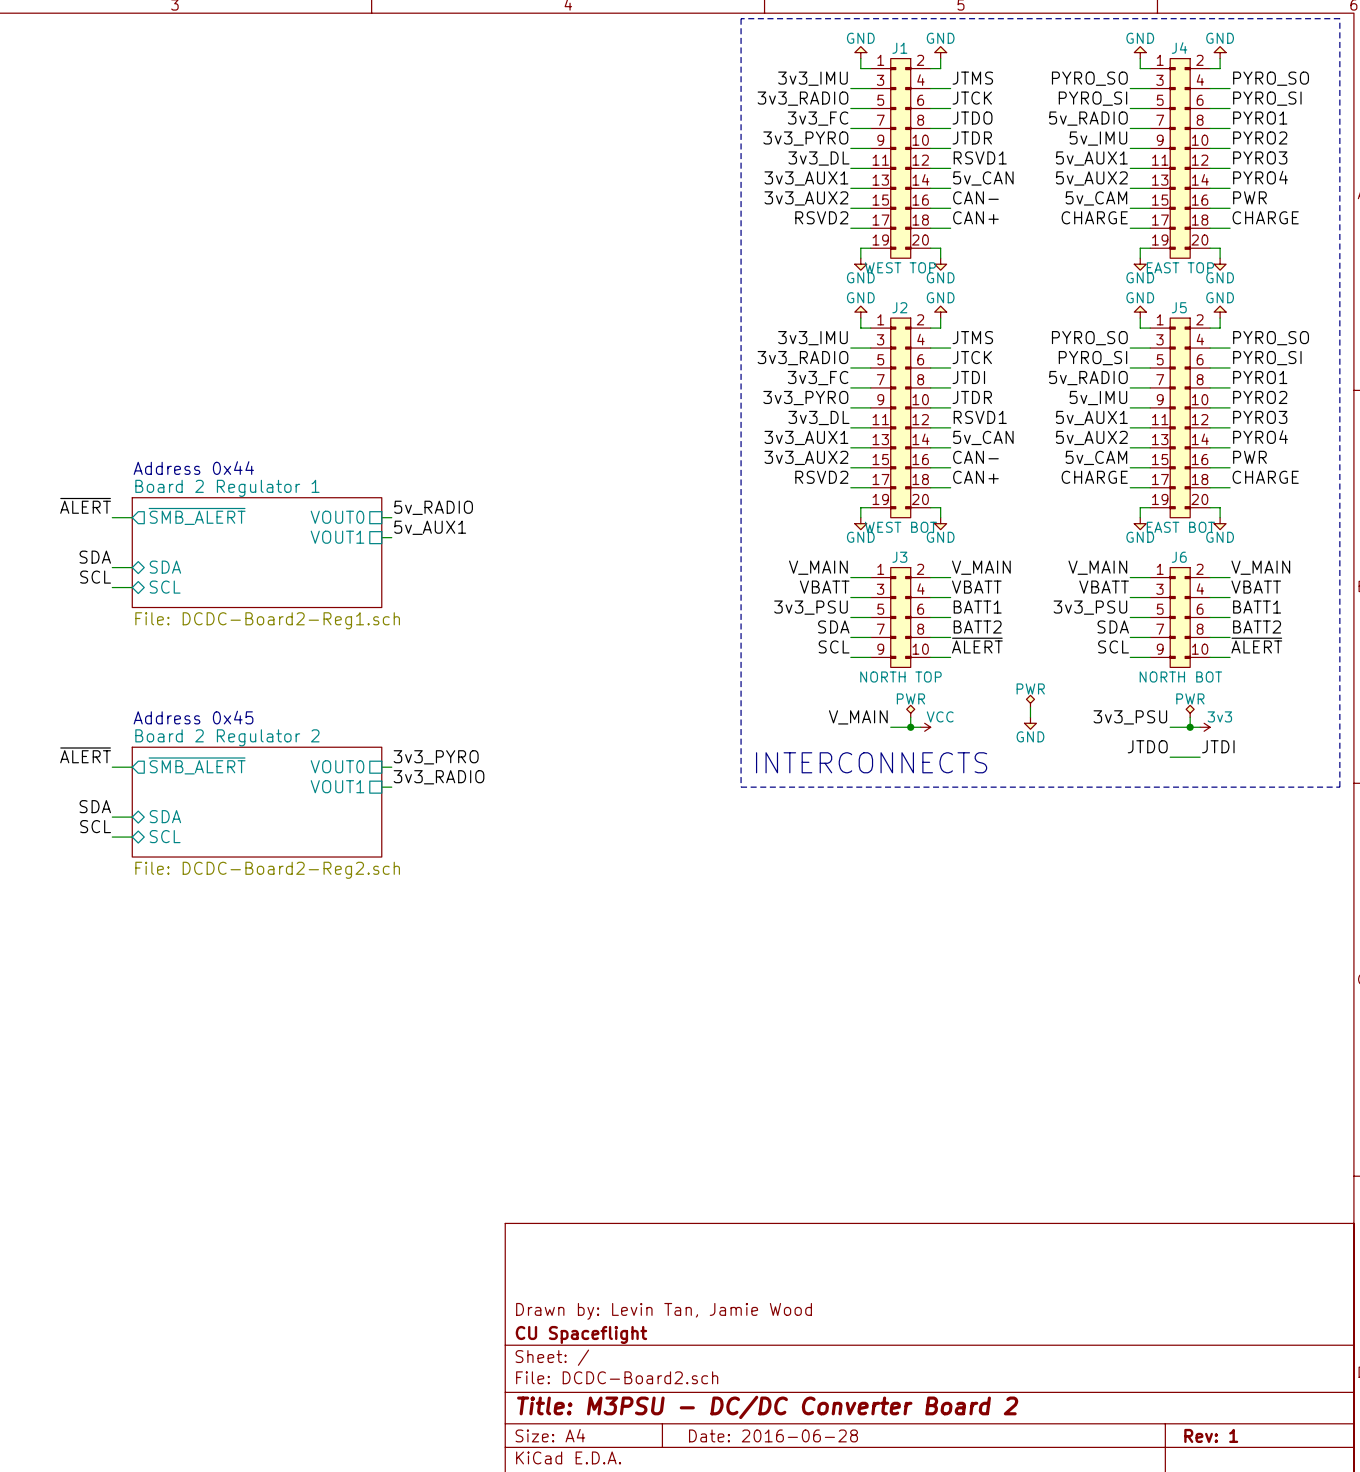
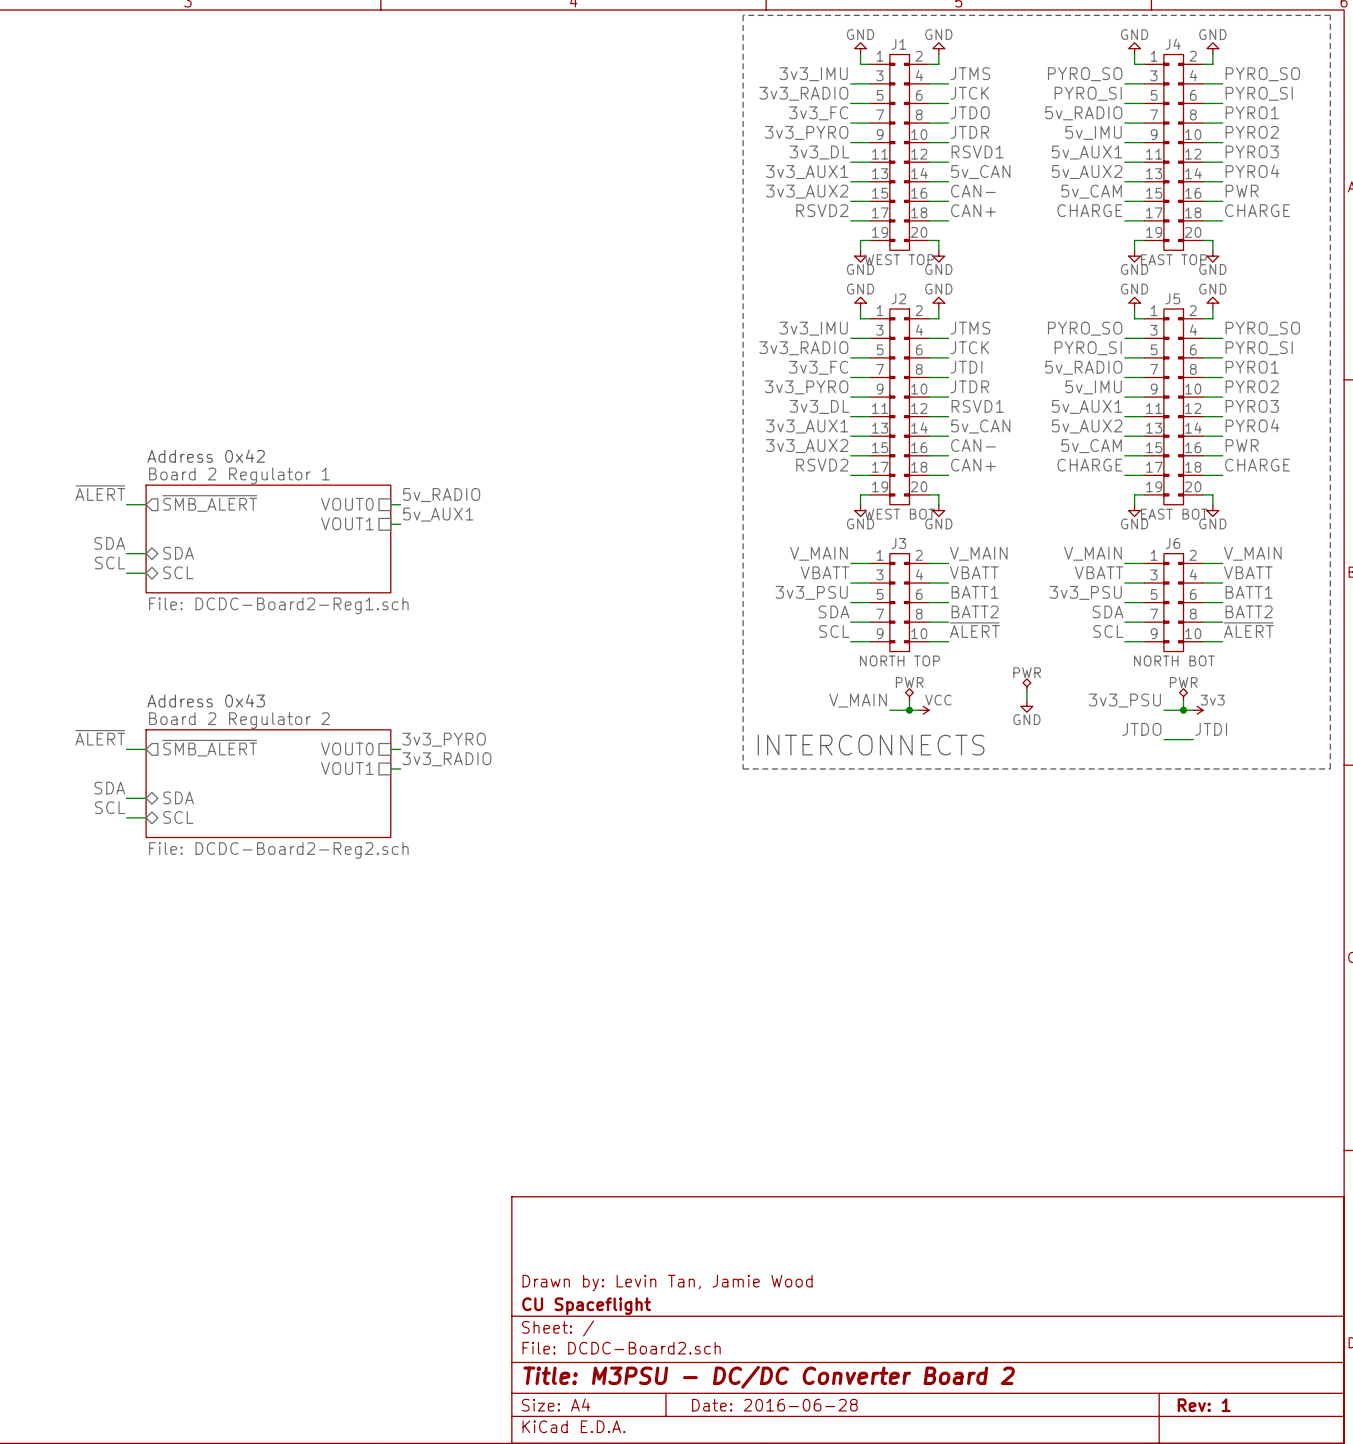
text: Address 0x44 (193, 468) -> Address 0x42 (206, 456)
text: Address 0x45 (193, 717) -> Address 0x43 (206, 700)

